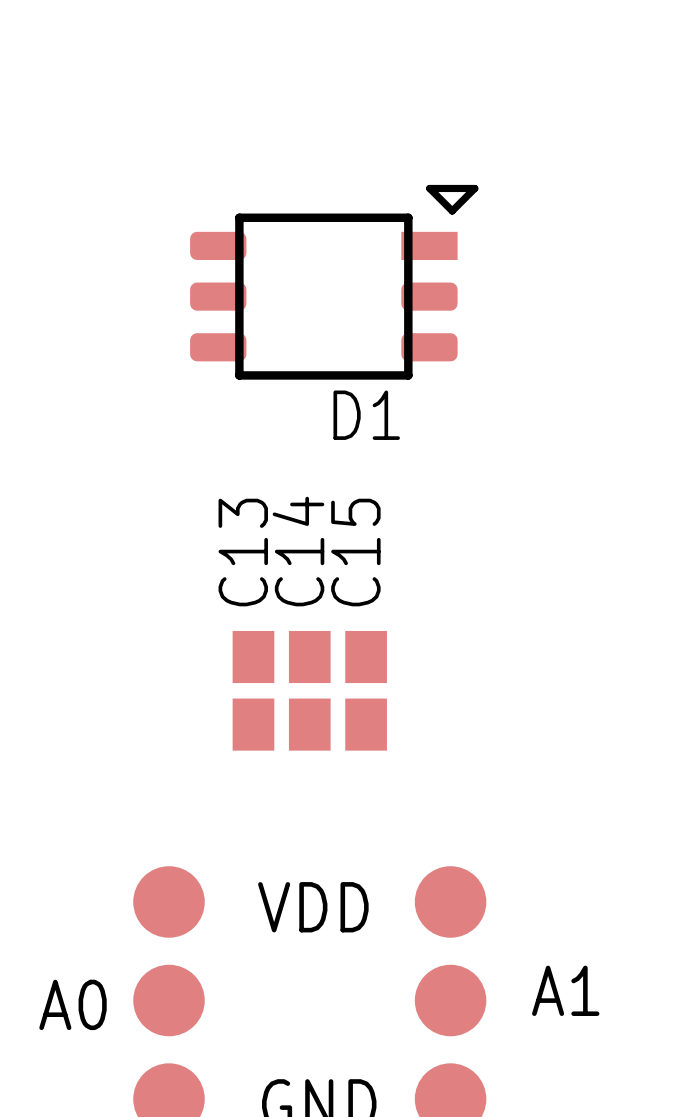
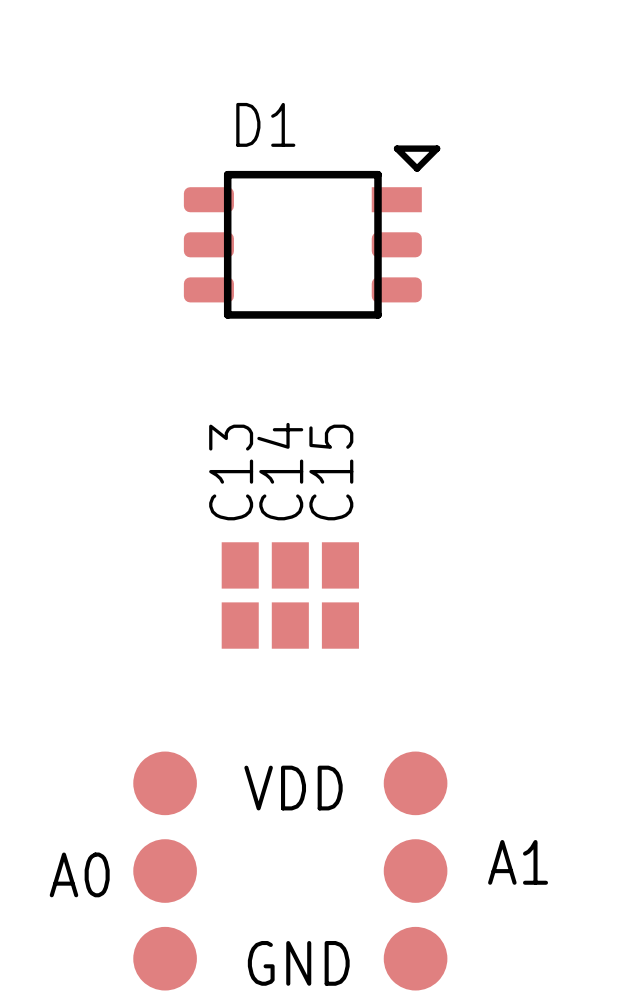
D1 name position: D1 (366, 415) -> D1 (265, 124)

